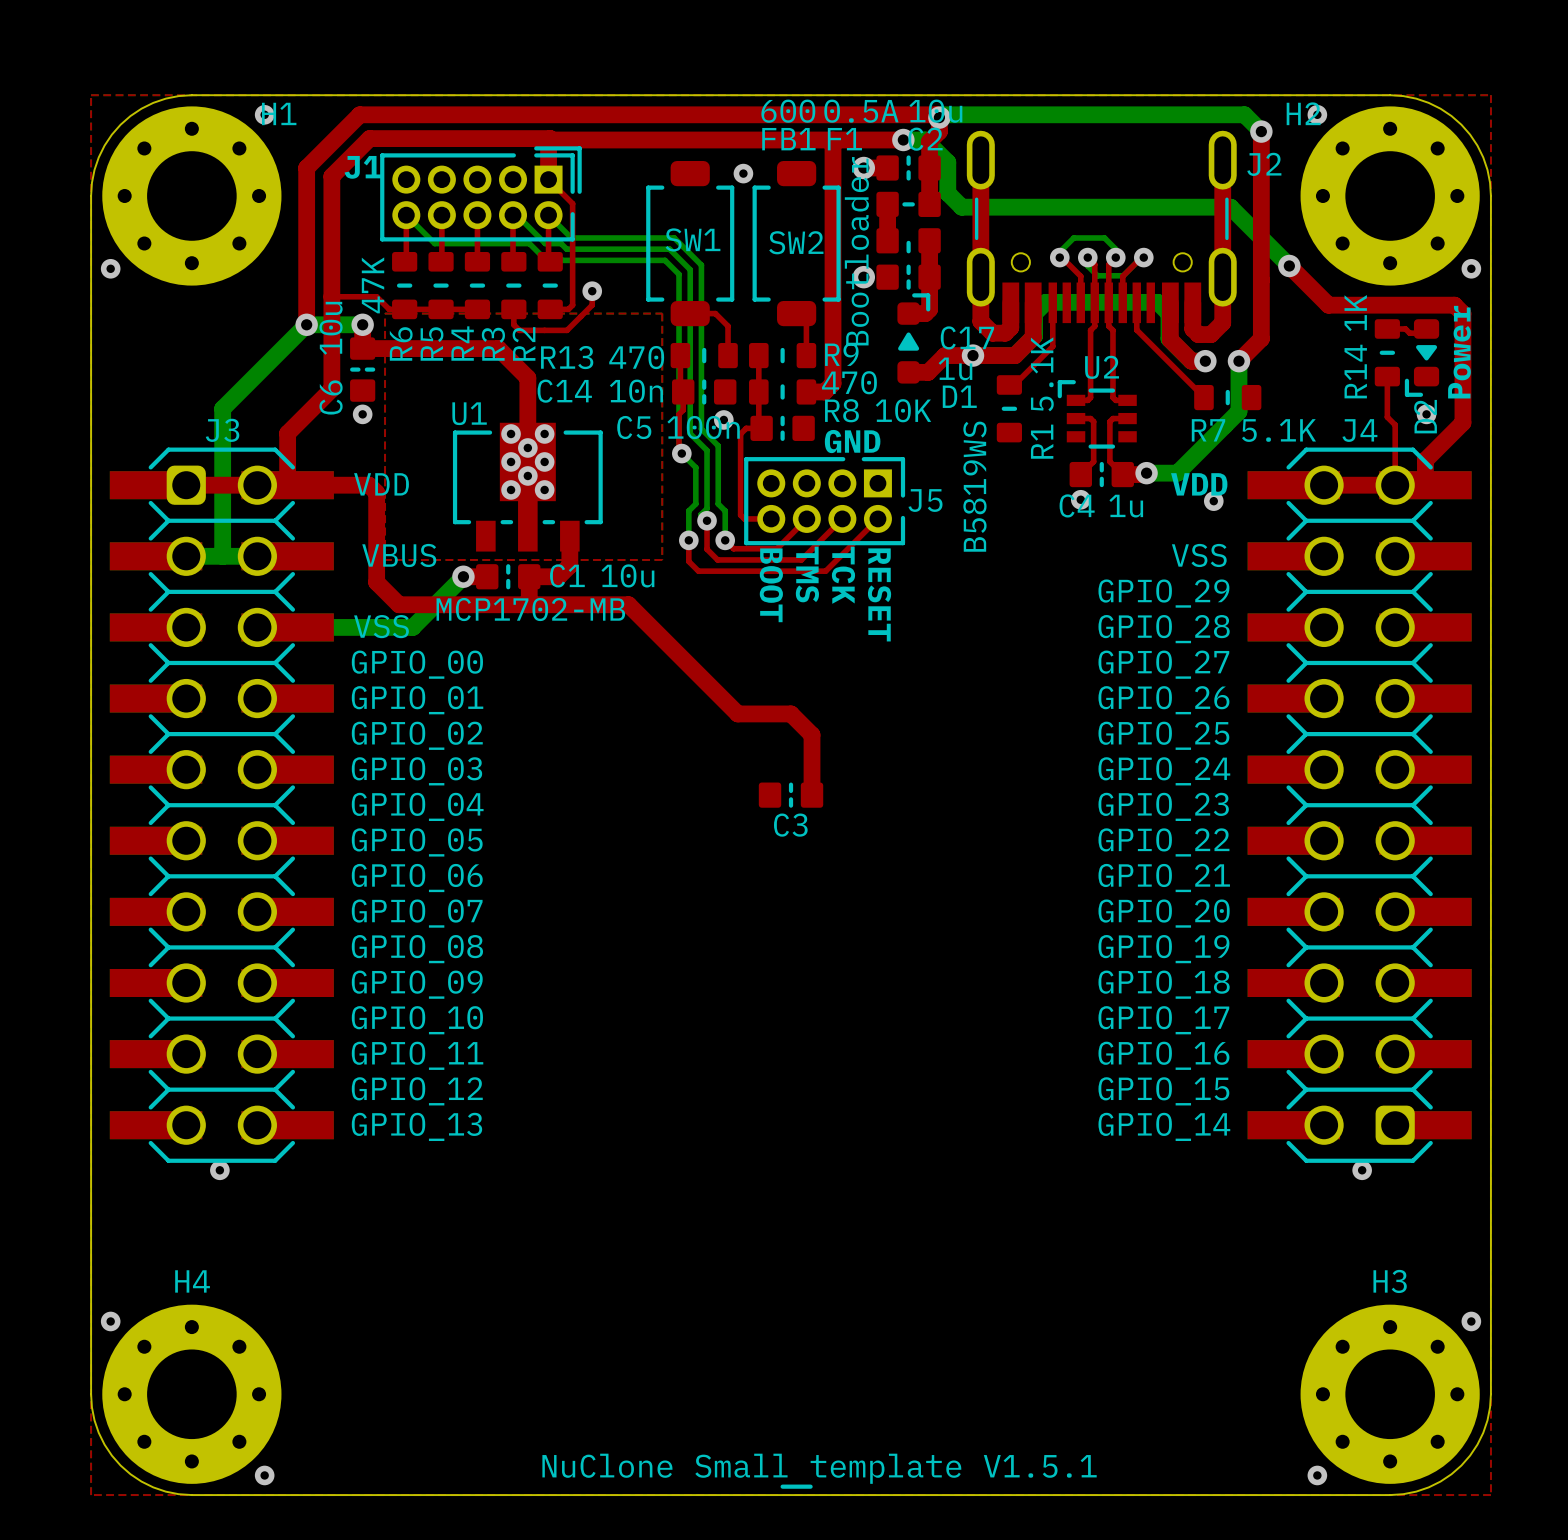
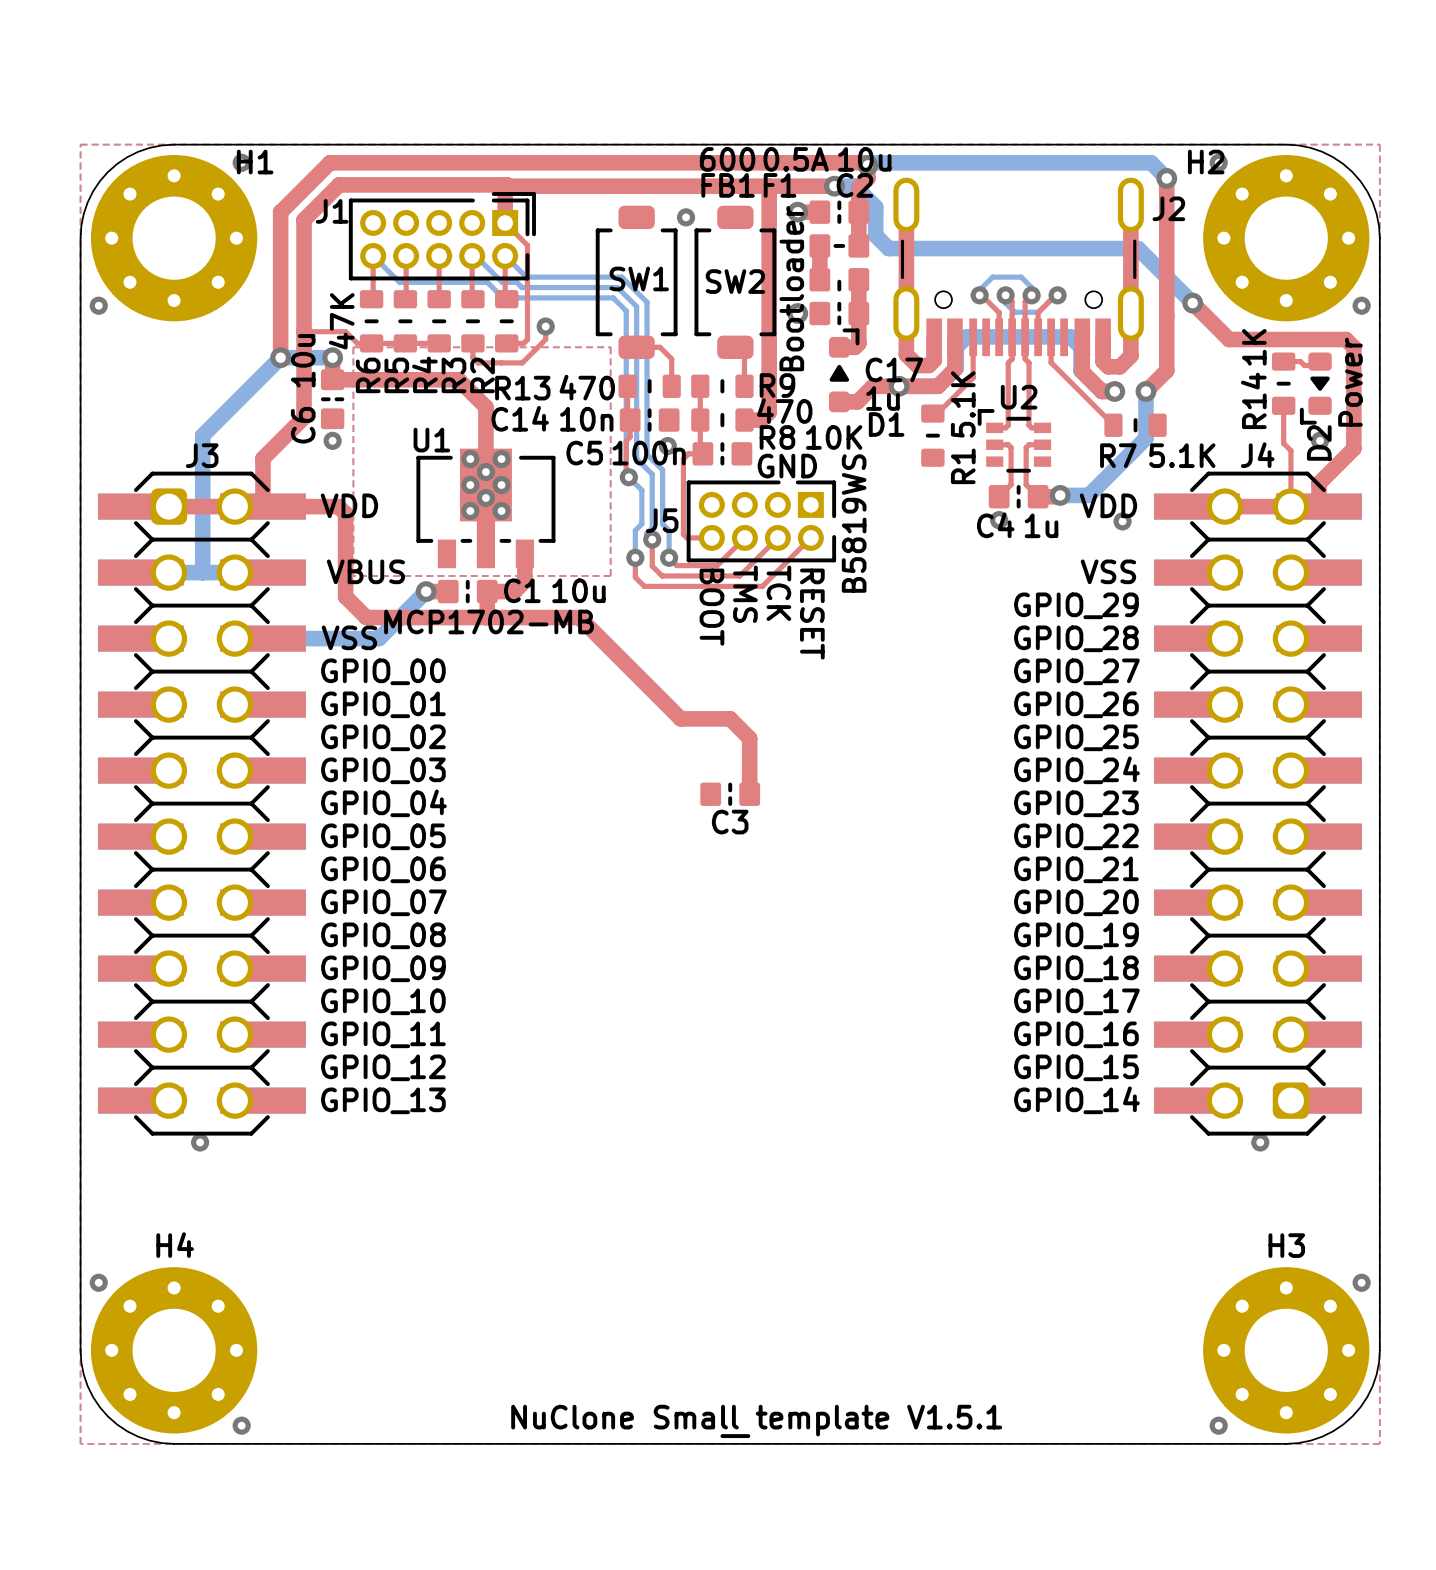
D1 value position: B5819WS (974, 486) -> B5819WS (854, 523)
J5 name position: J5 (925, 500) -> J5 (662, 520)

